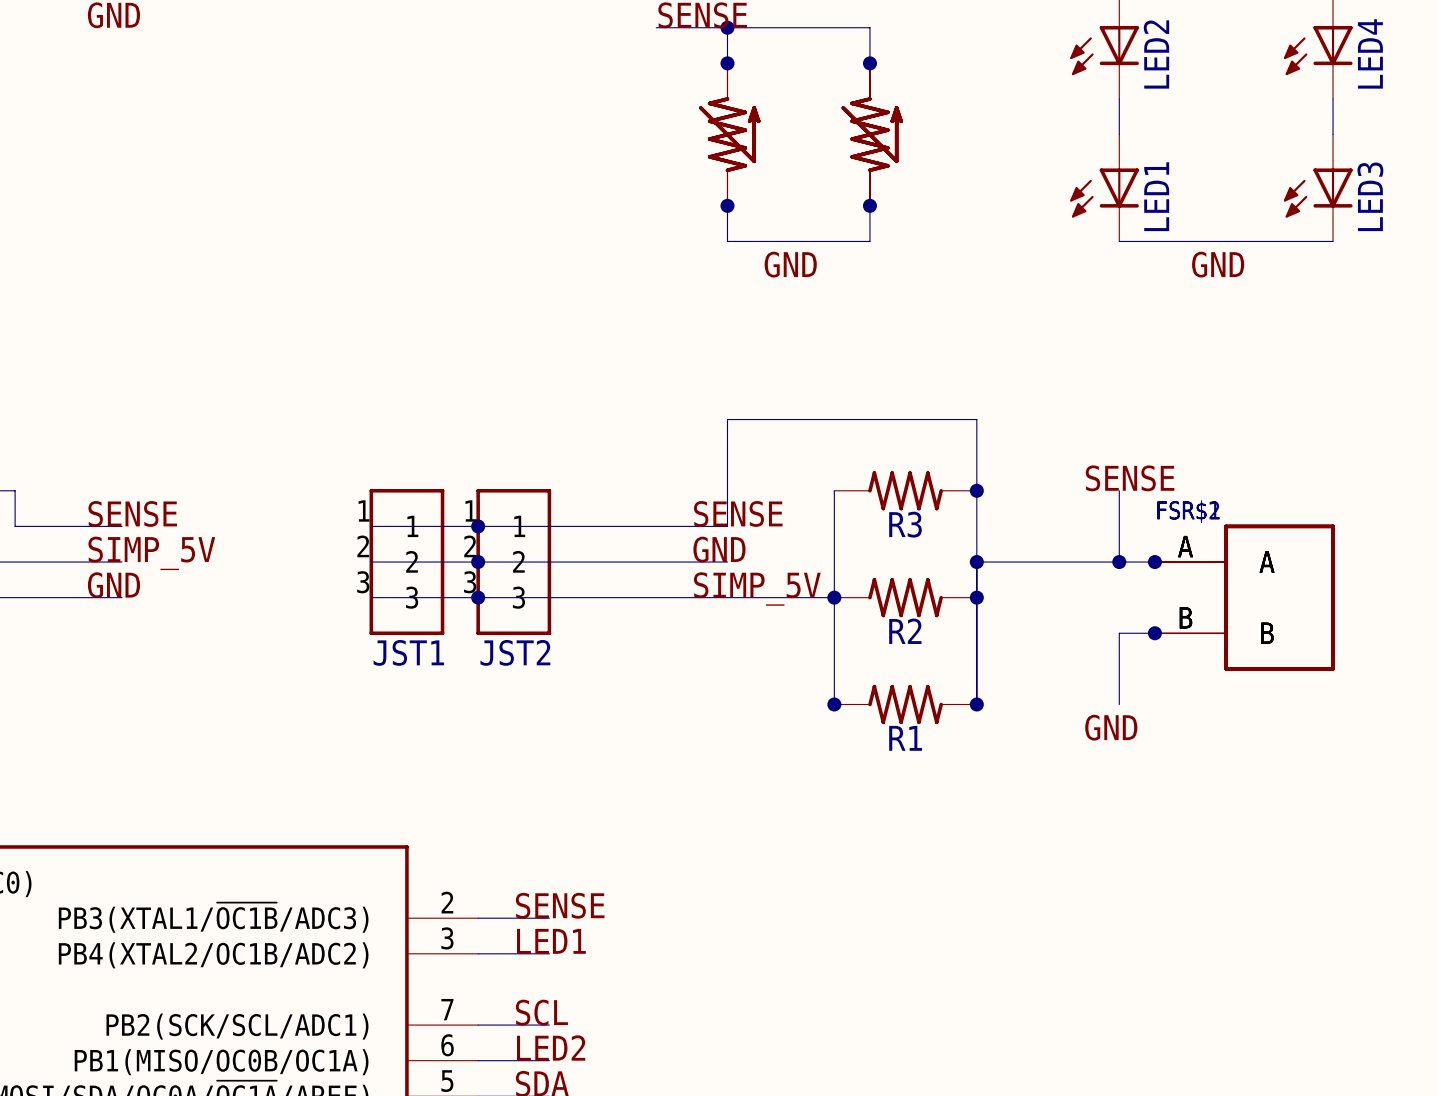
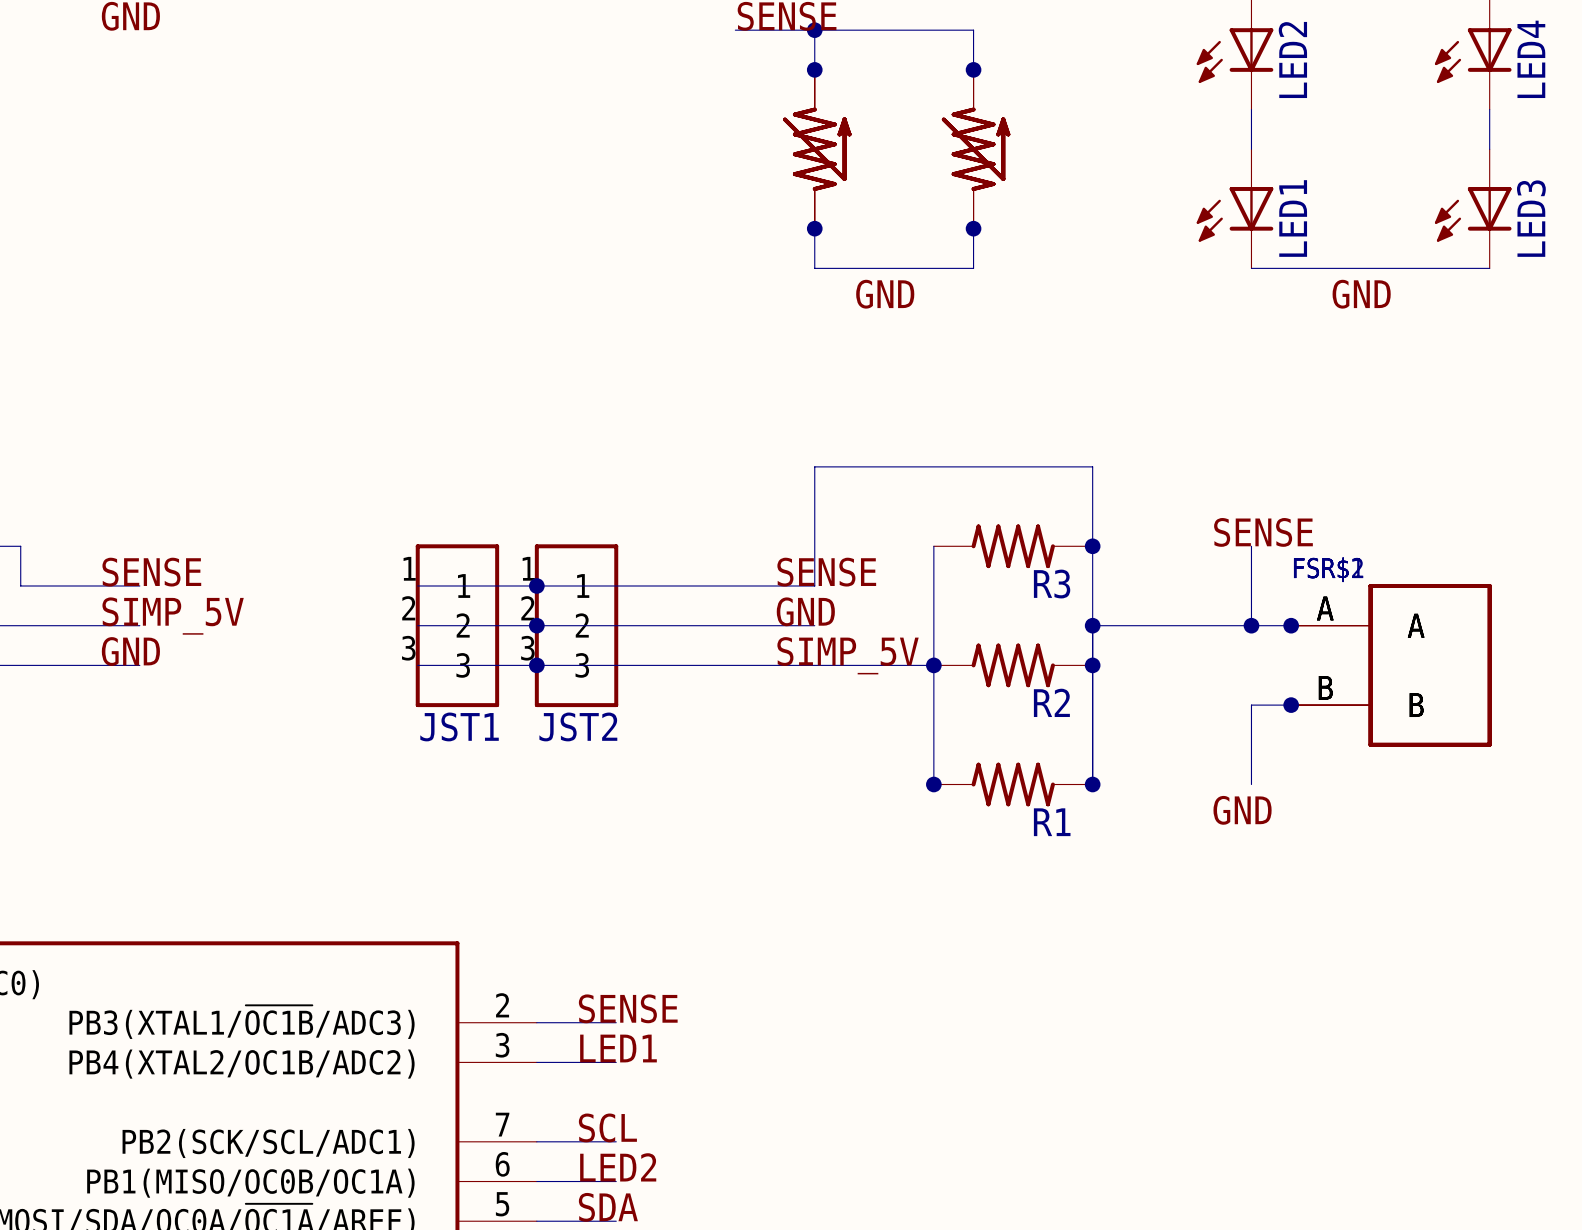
R3 name position: R3 (905, 524) -> R3 (1052, 584)
R2 name position: R2 (905, 631) -> R2 (1051, 702)
R1 name position: R1 (905, 738) -> R1 (1052, 822)

